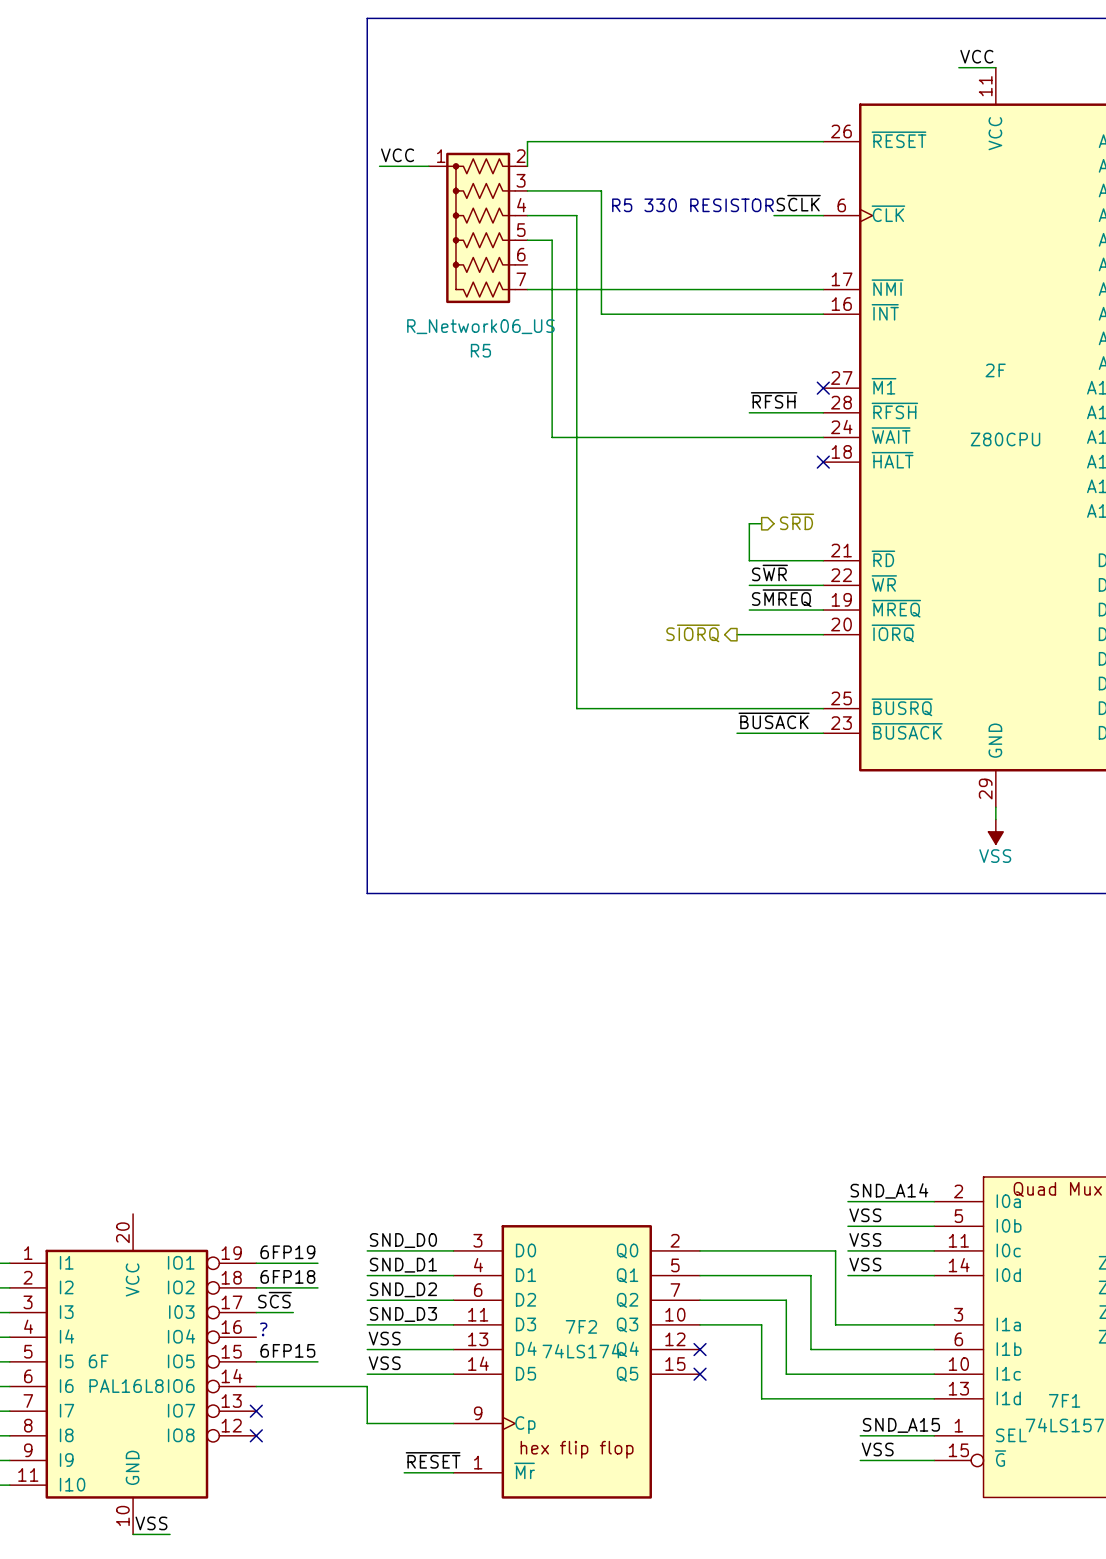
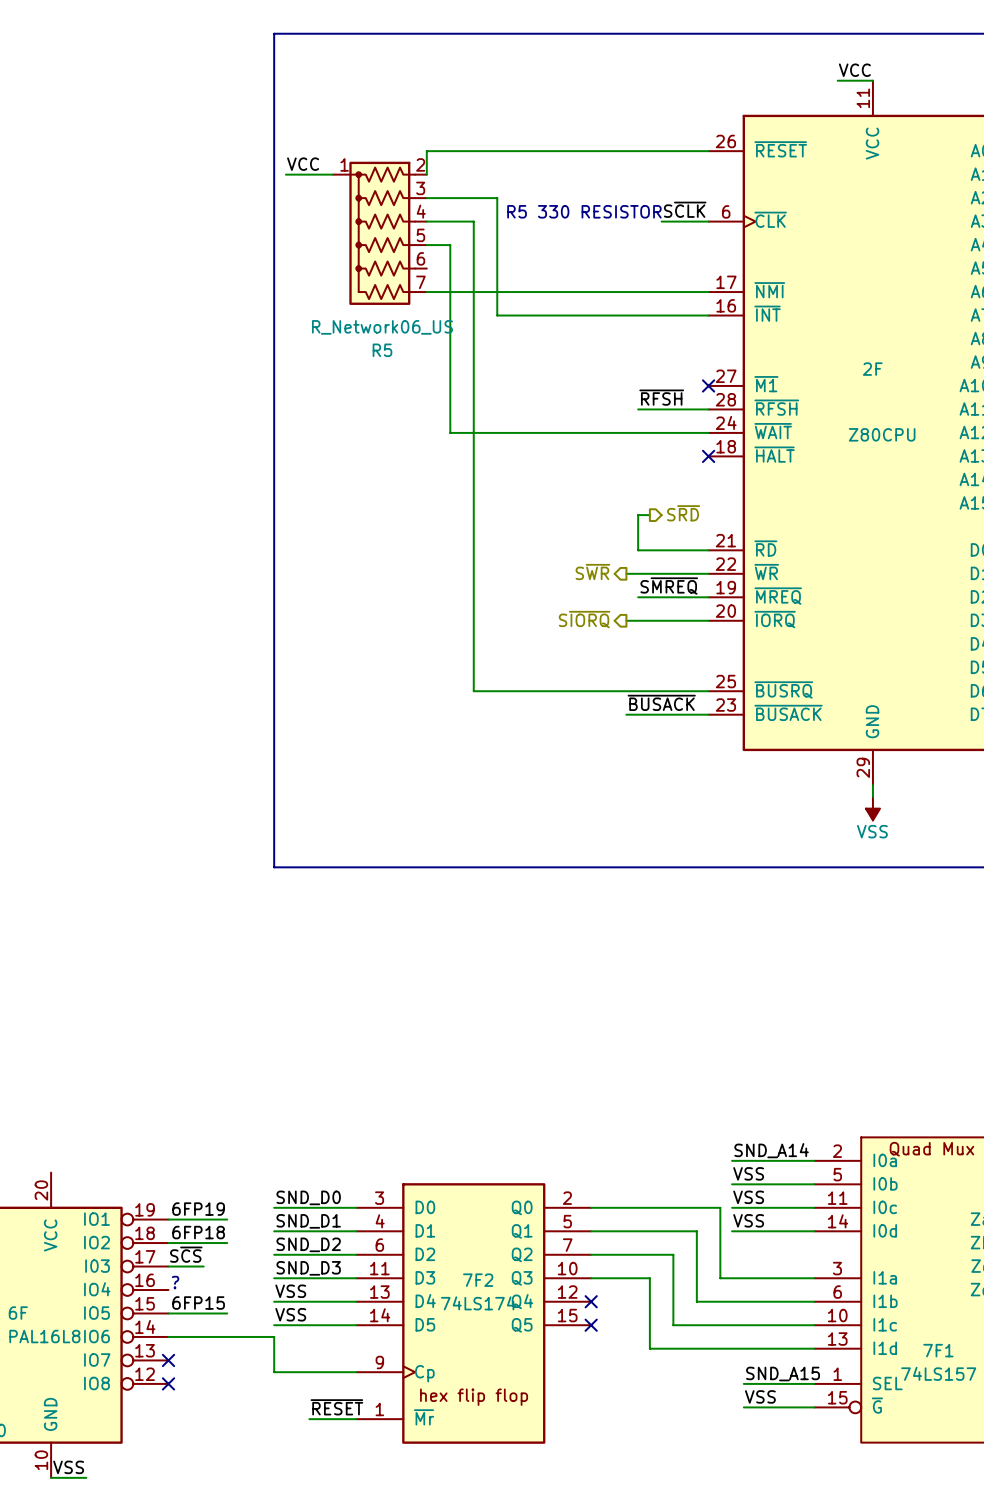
label: S~{WR} (769, 572) -> none
hierarchical label: none -> S~{WR} (592, 572)
wire: none -> (626, 573) (638, 573)

